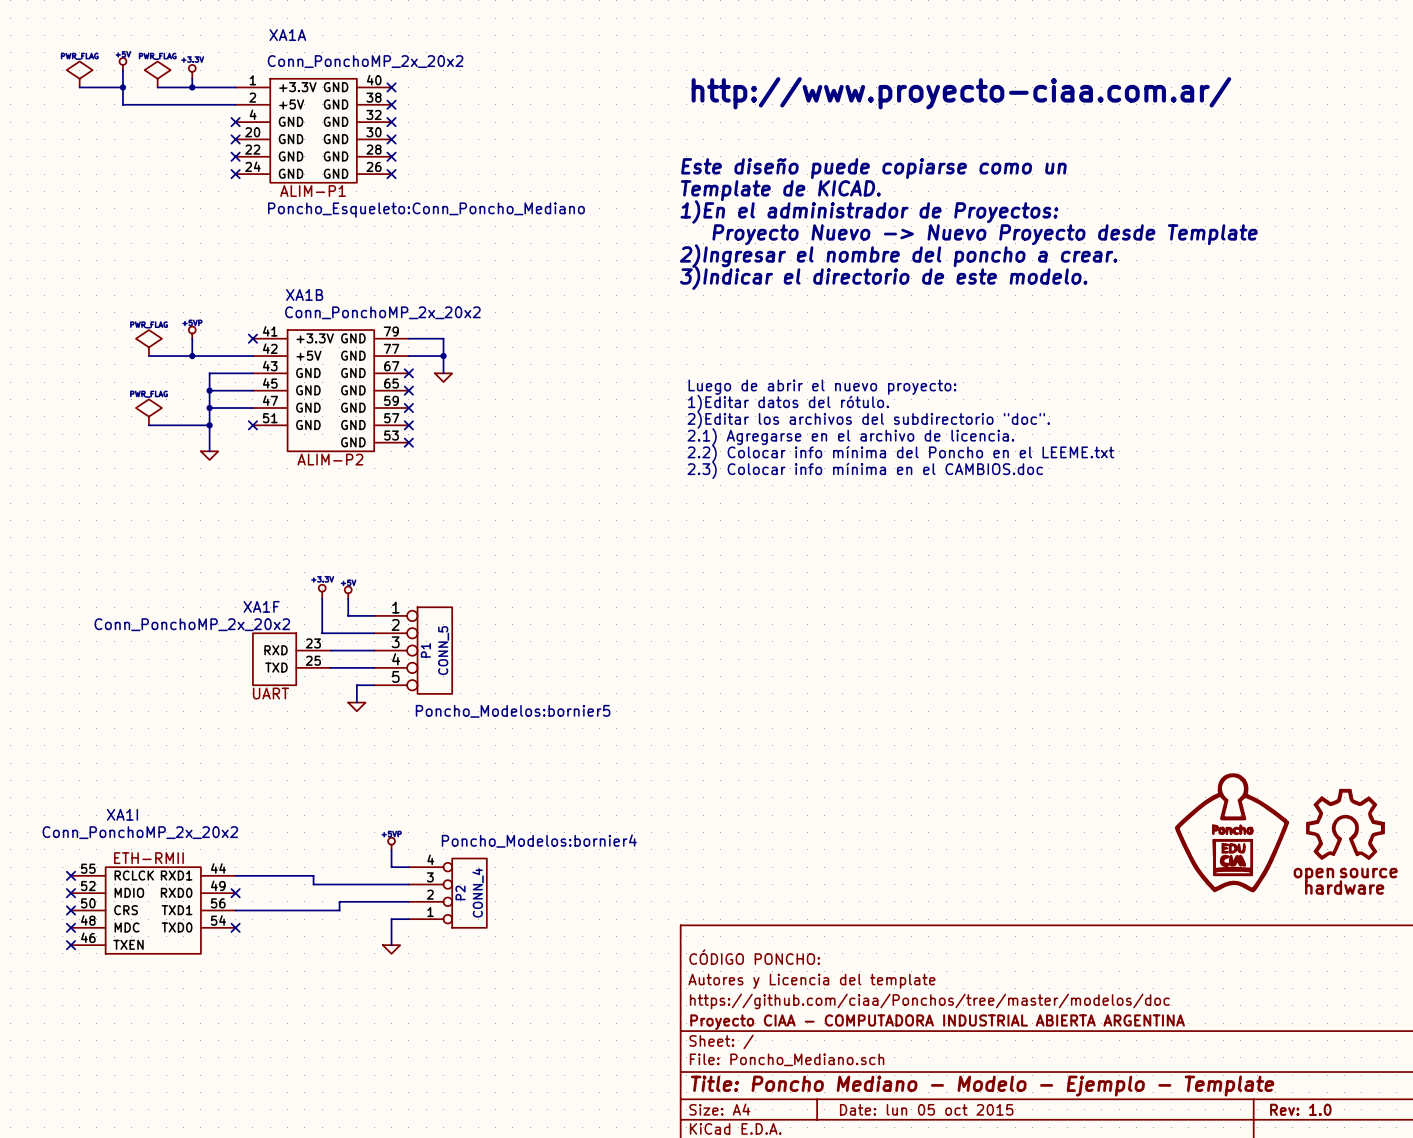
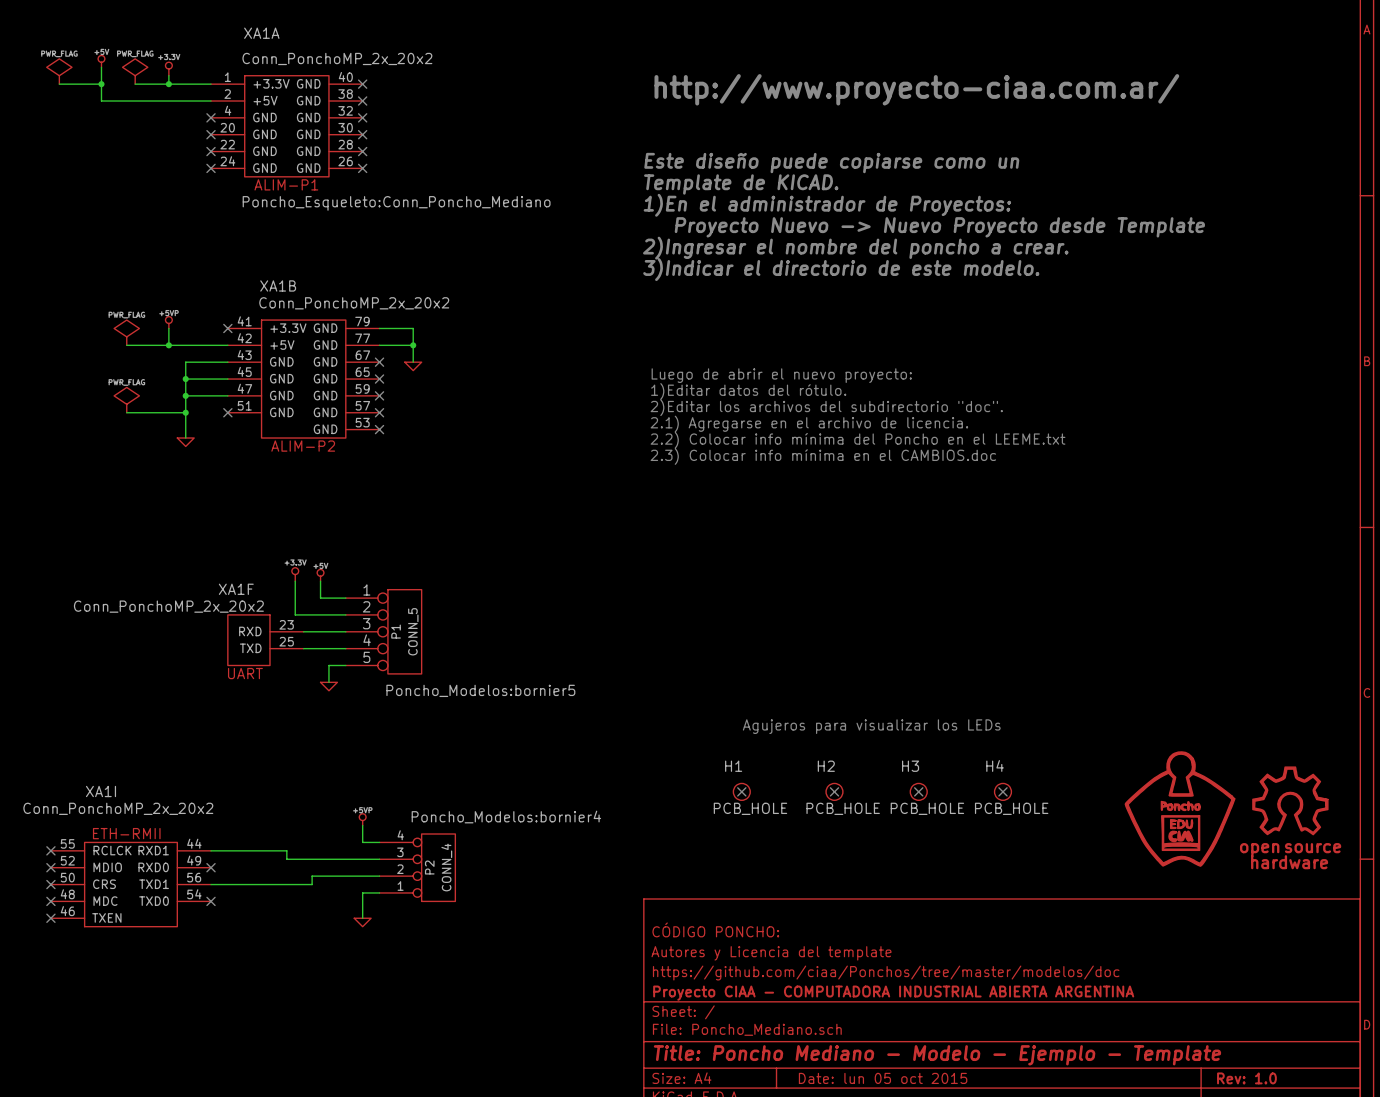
text: none -> Agujeros para visualizar los LEDs (871, 726)
H1: none -> PCB_HOLE (741, 791)
no-connect mark: none -> (741, 791)
H2: none -> PCB_HOLE (834, 791)
no-connect mark: none -> (834, 791)
H3: none -> PCB_HOLE (918, 791)
no-connect mark: none -> (918, 791)
H4: none -> PCB_HOLE (1002, 791)
no-connect mark: none -> (1002, 791)

